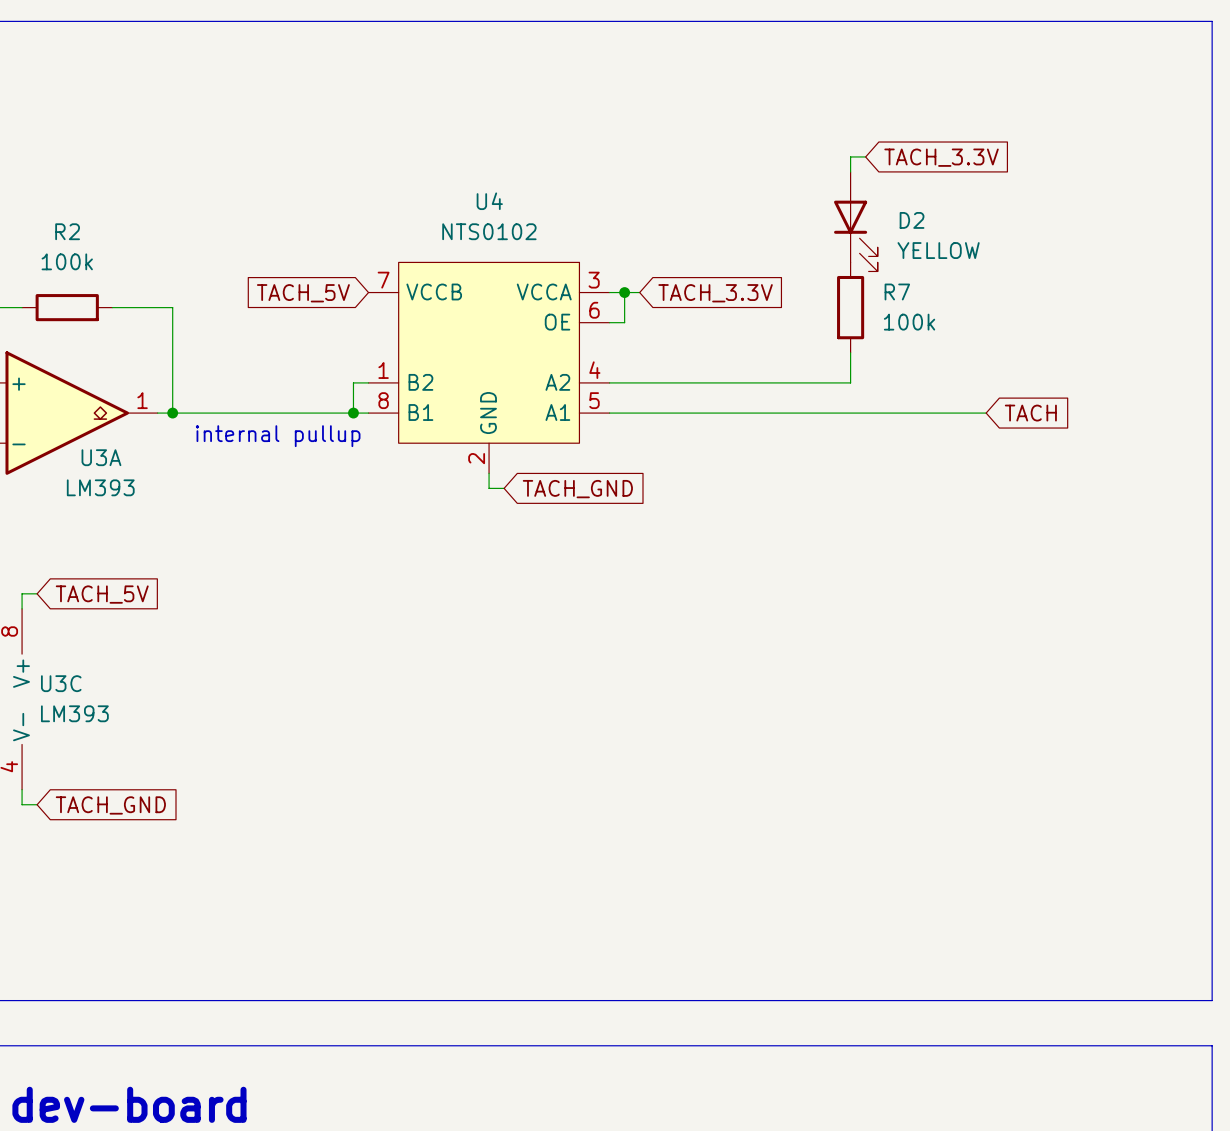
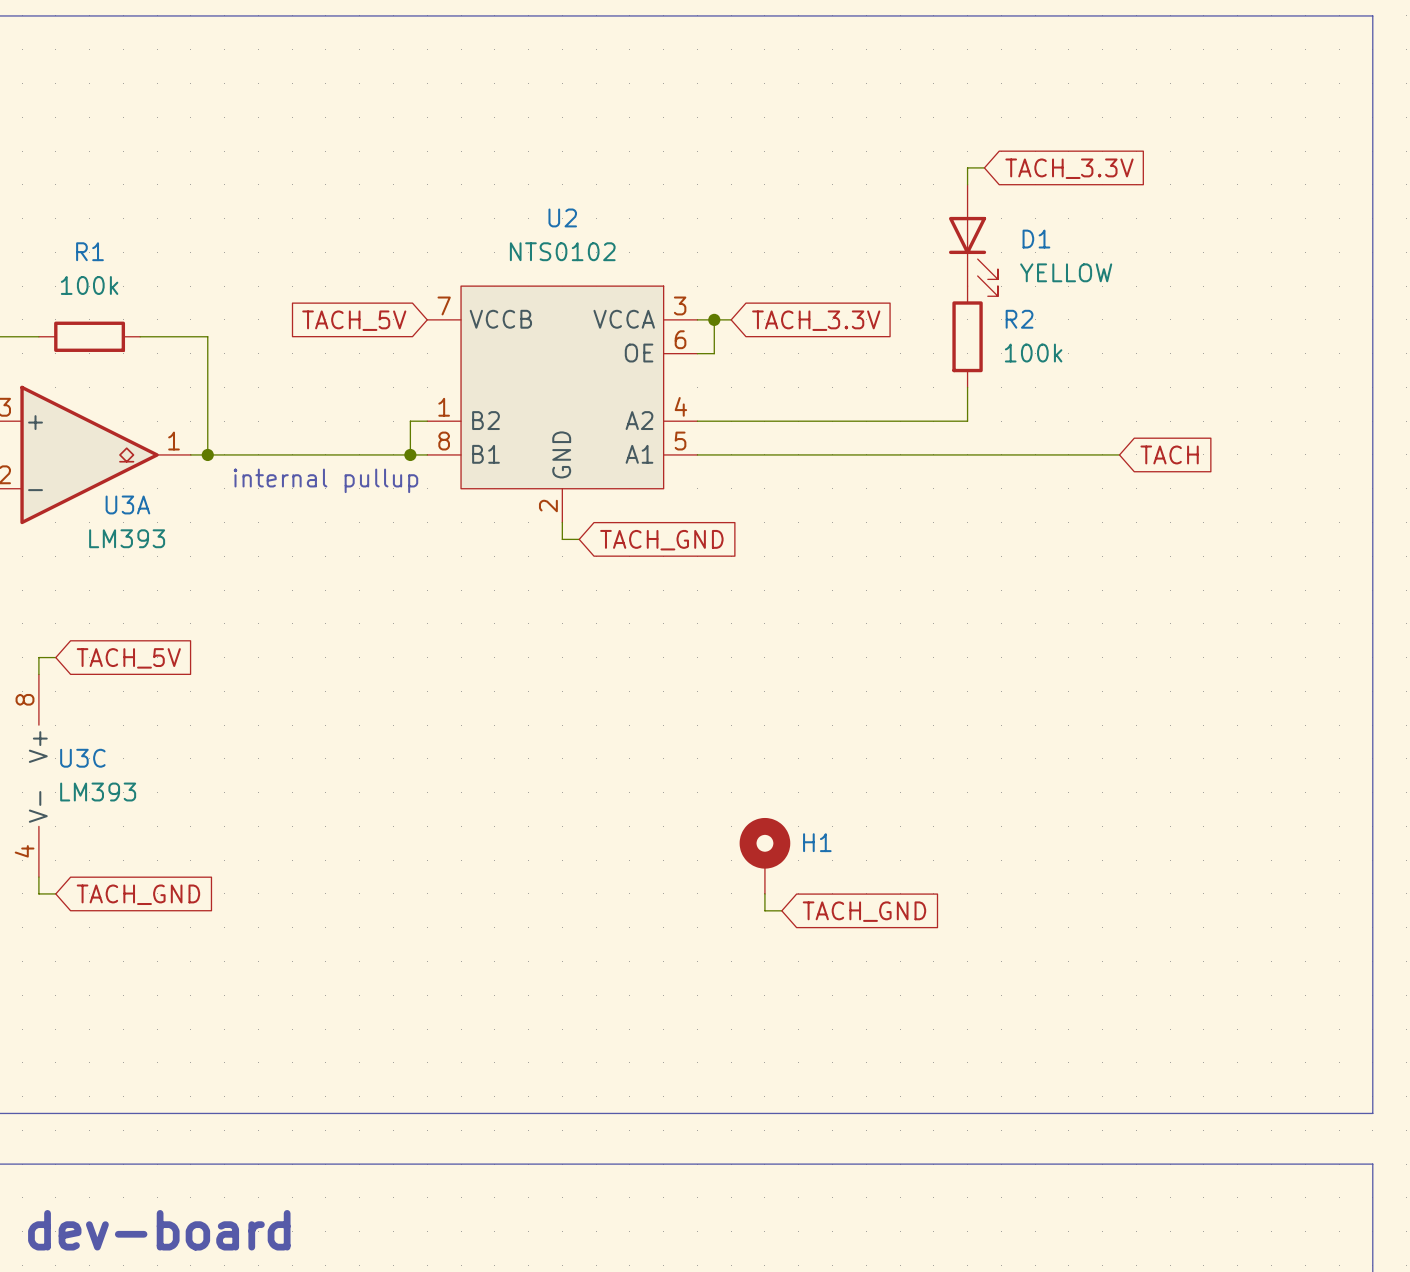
U4 name: U4 (489, 201) -> U2 (562, 217)
D2 name: D2 (912, 220) -> D1 (1036, 239)
R2 name: R2 (67, 231) -> R1 (89, 251)
R7 name: R7 (897, 291) -> R2 (1019, 319)
H1: none -> (764, 855)
wire: none -> (764, 893) (764, 910) (781, 910)
global label: none -> TACH_GND (864, 911)

